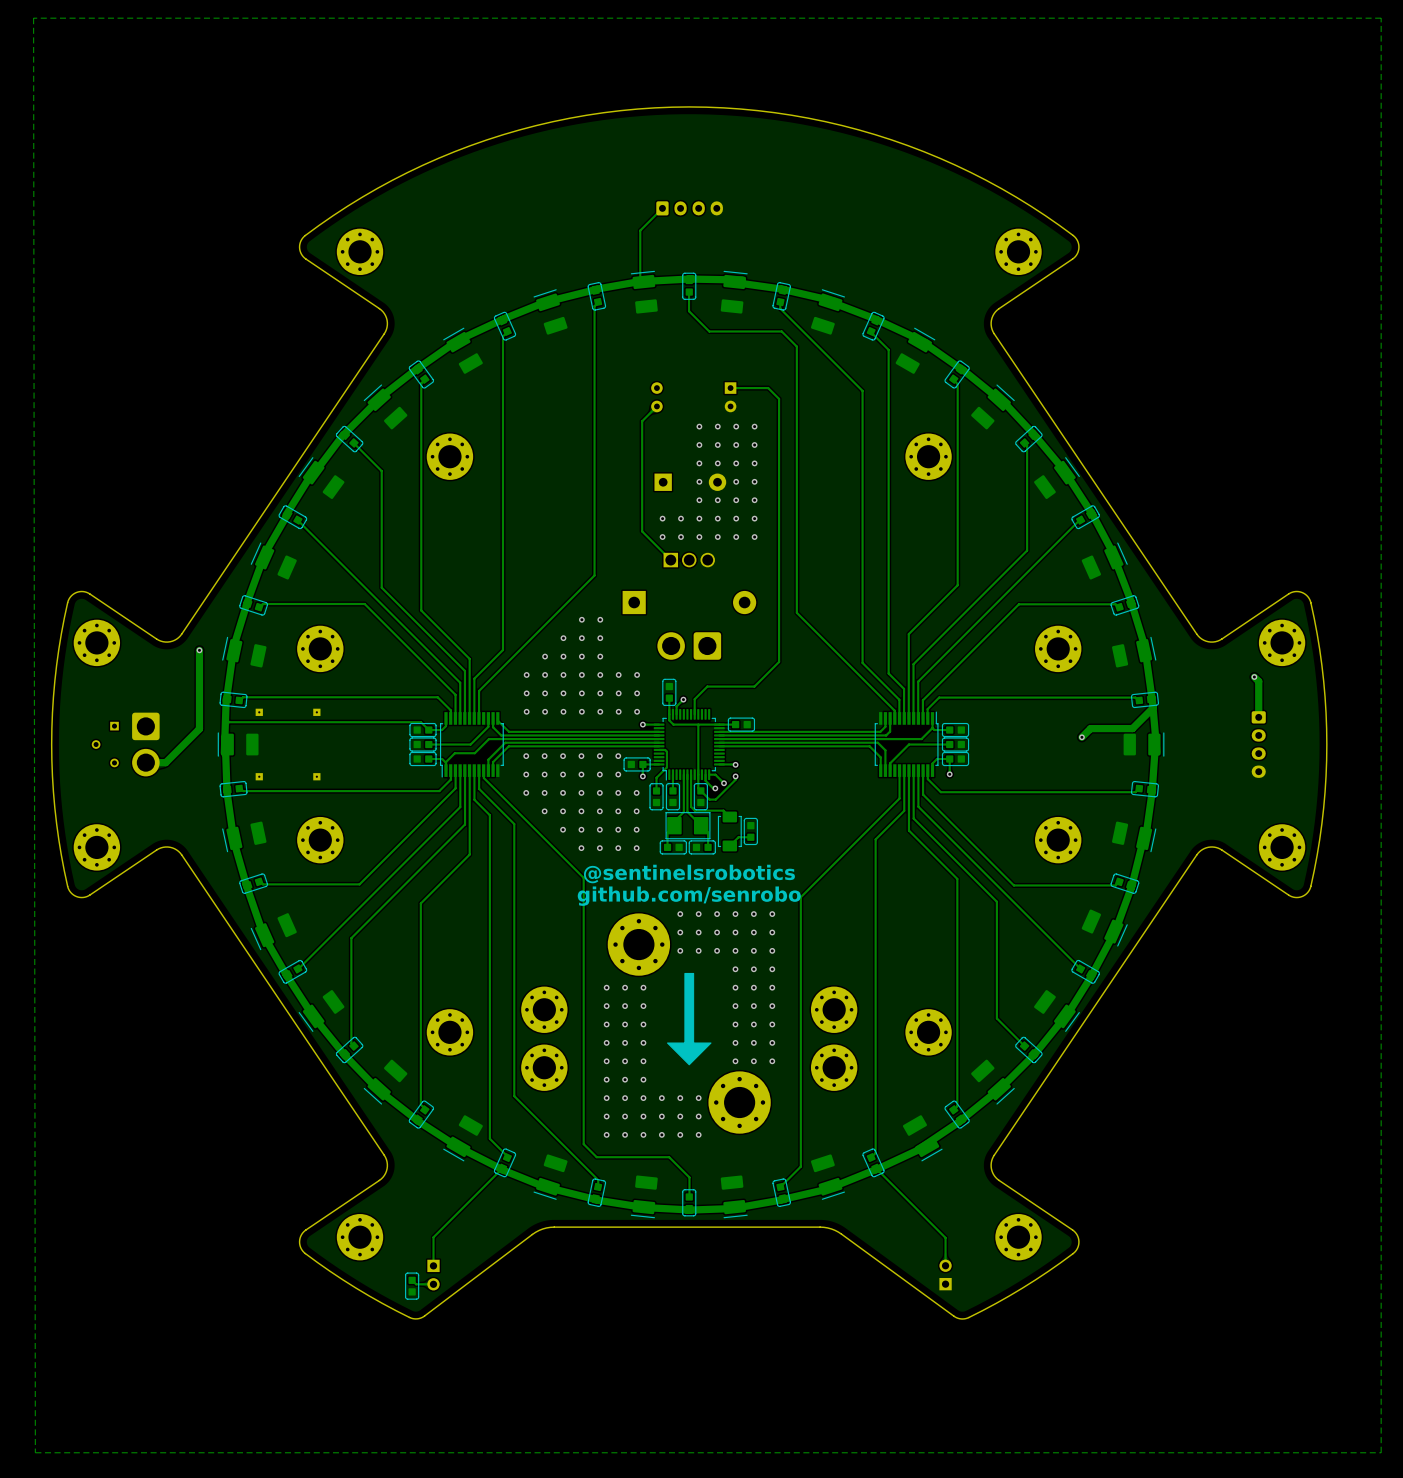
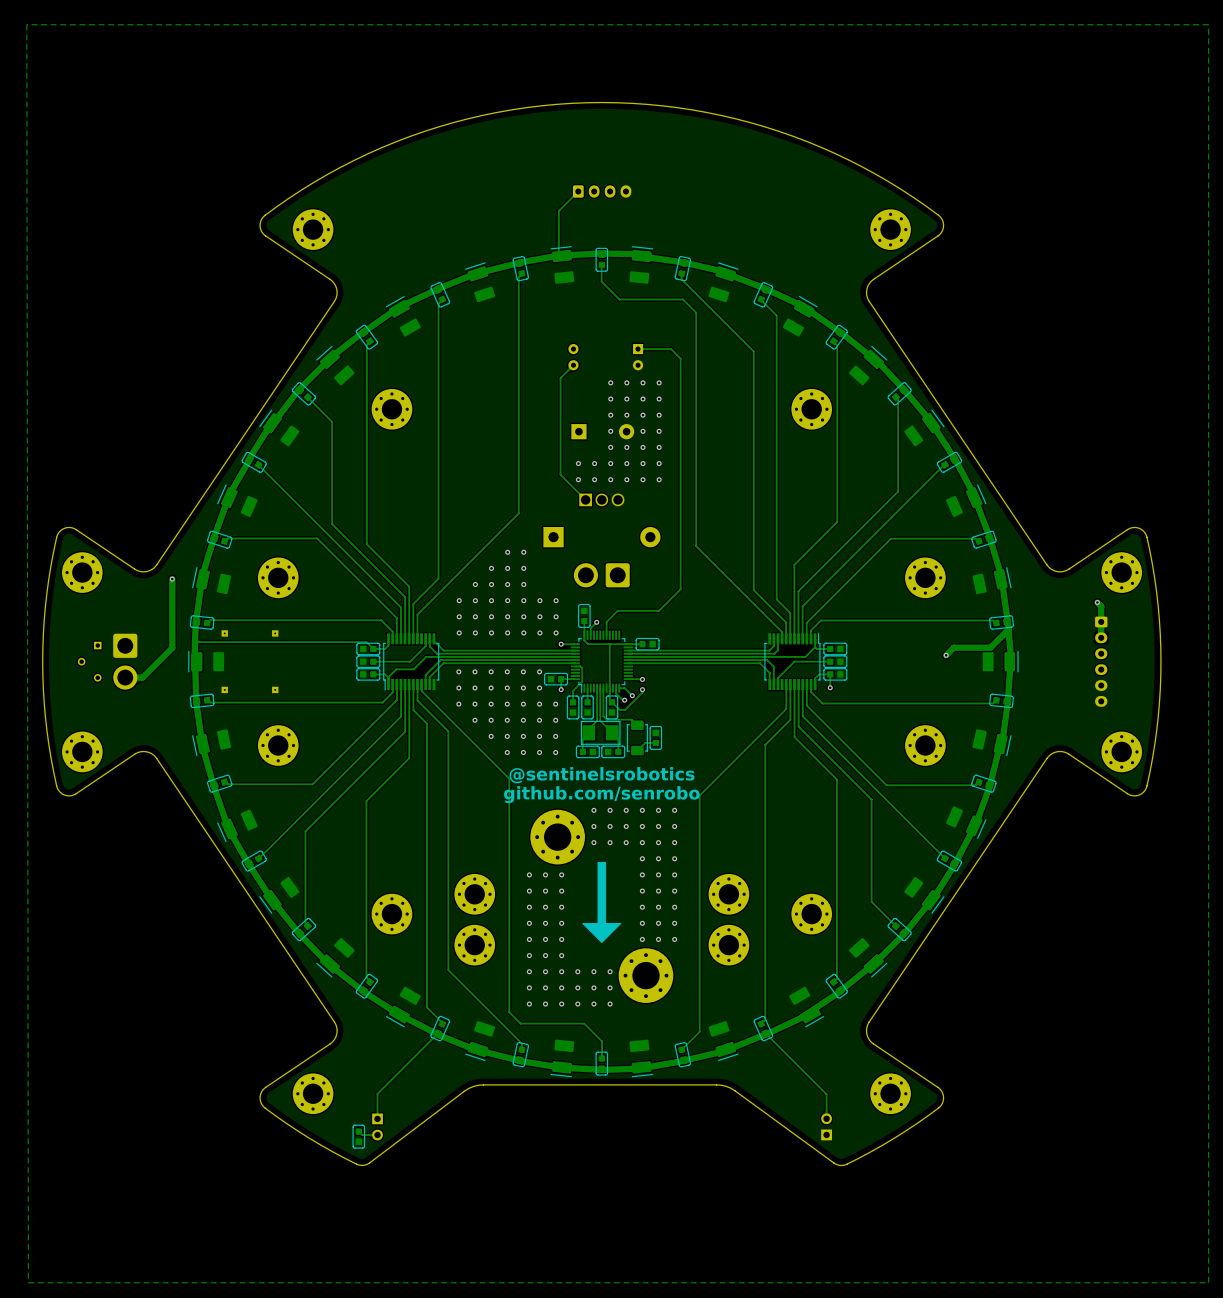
part footprint: [1251, 711, 1266, 778] -> [1095, 616, 1108, 707]

